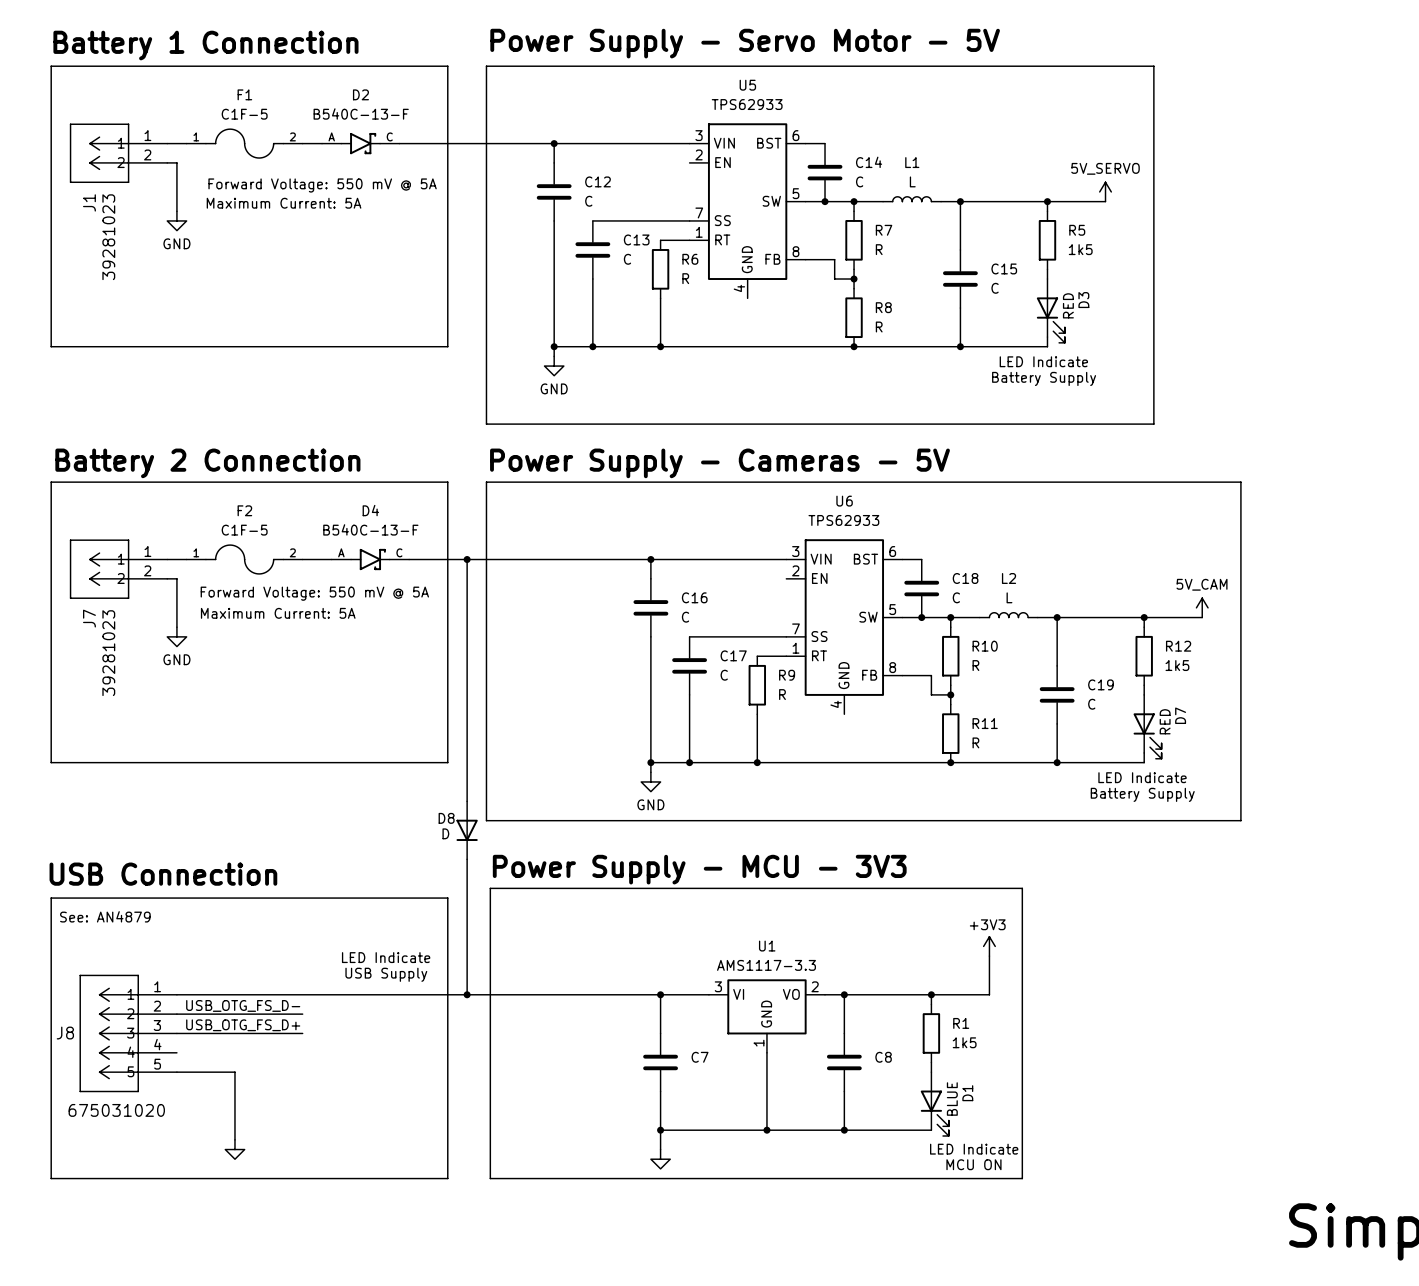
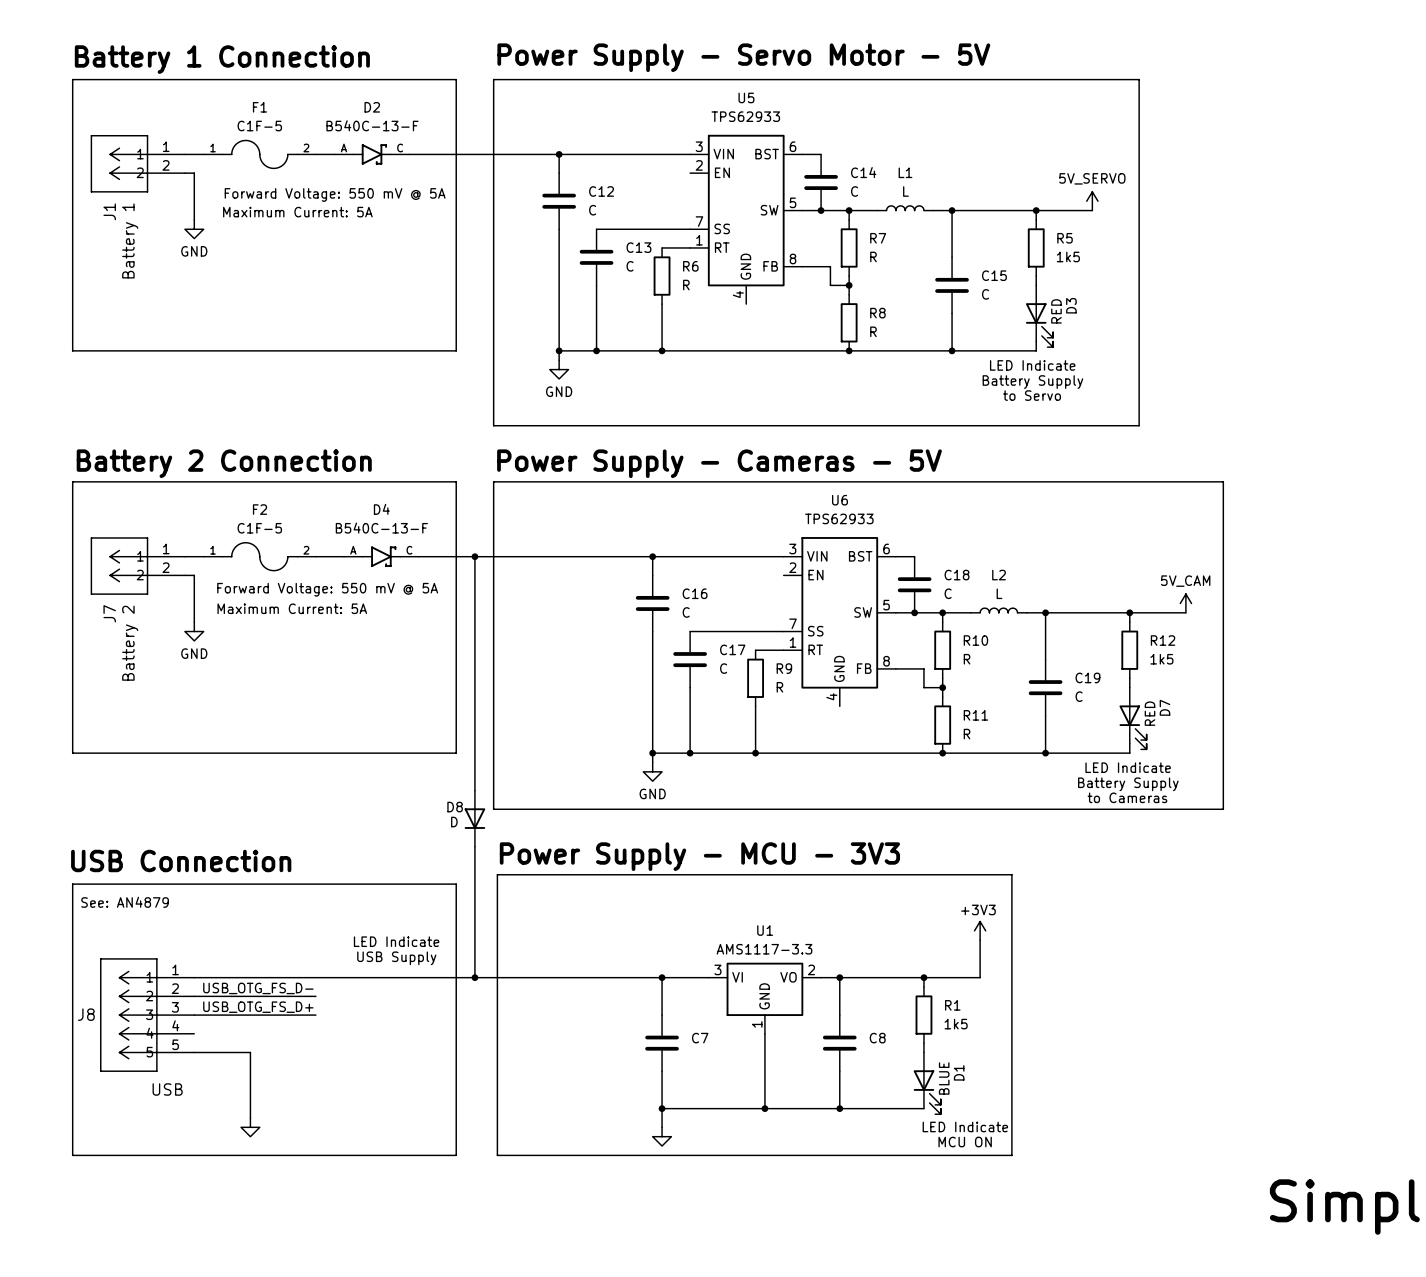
J1 value: 39281023 (108, 237) -> Battery 1 (130, 240)
text: none -> to Servo (1032, 395)
J7 value: 39281023 (108, 653) -> Battery 2 (130, 643)
text: none -> to Cameras (1127, 797)
J8 value: 675031020 (116, 1110) -> USB (167, 1089)

